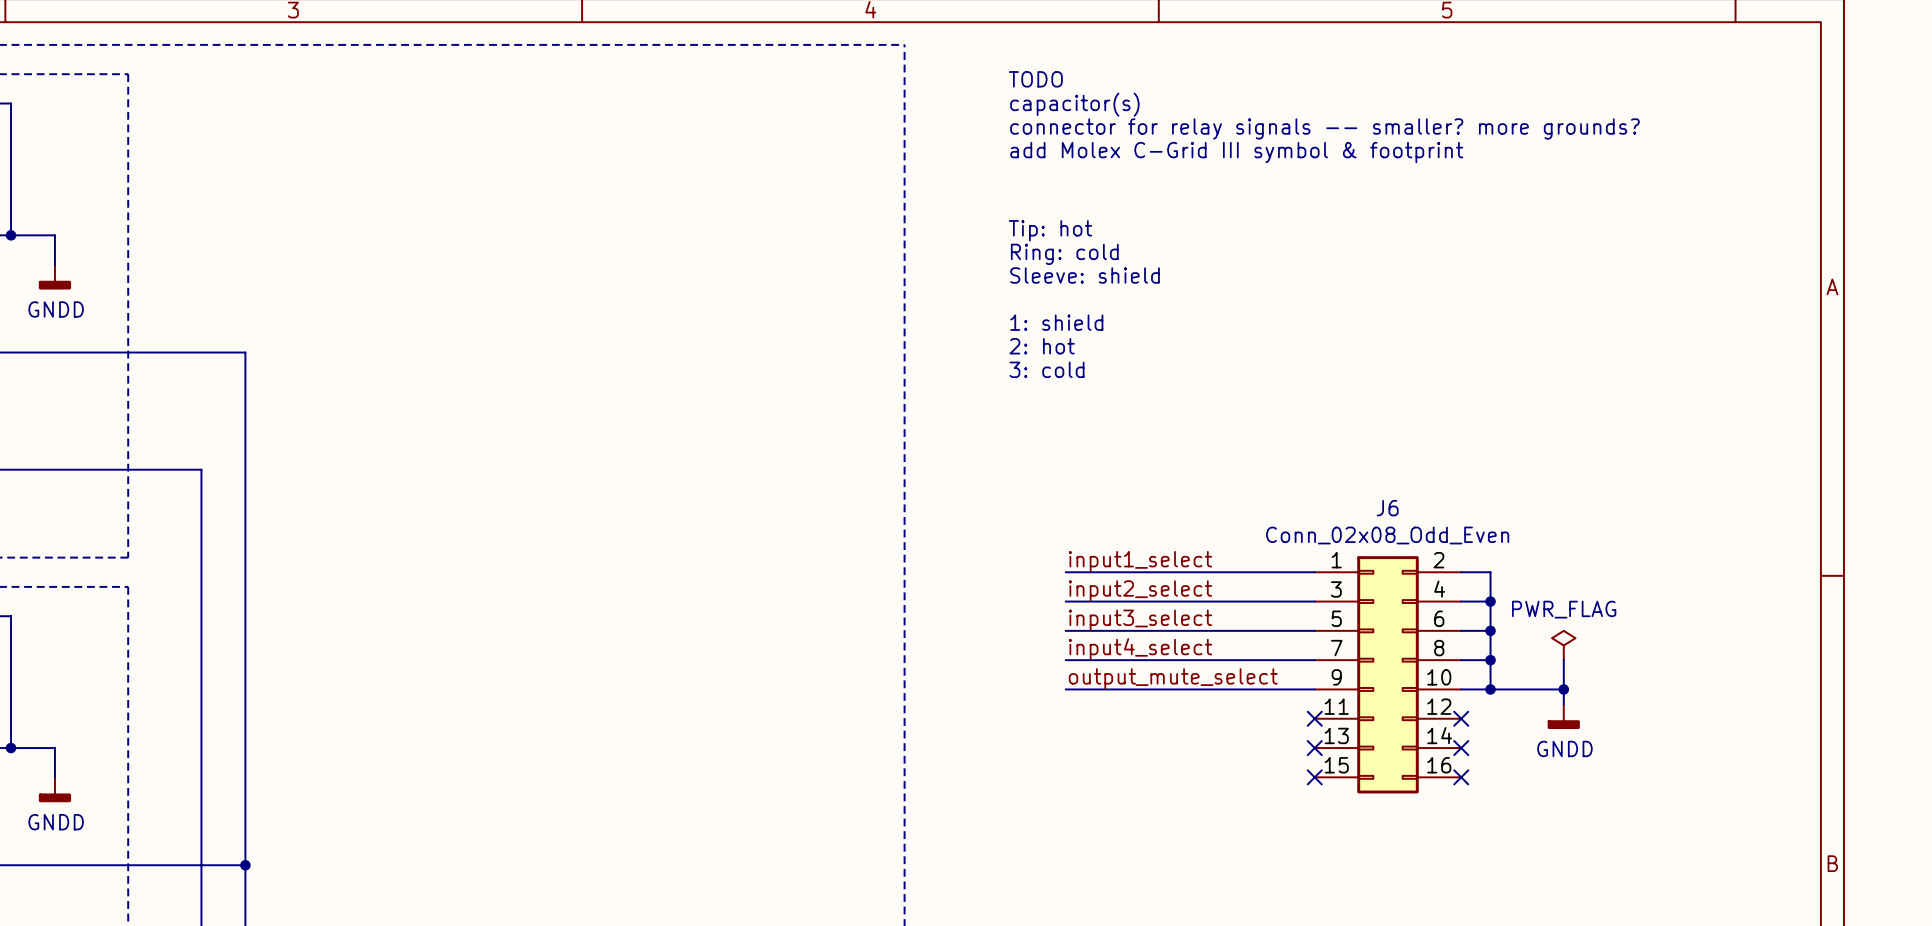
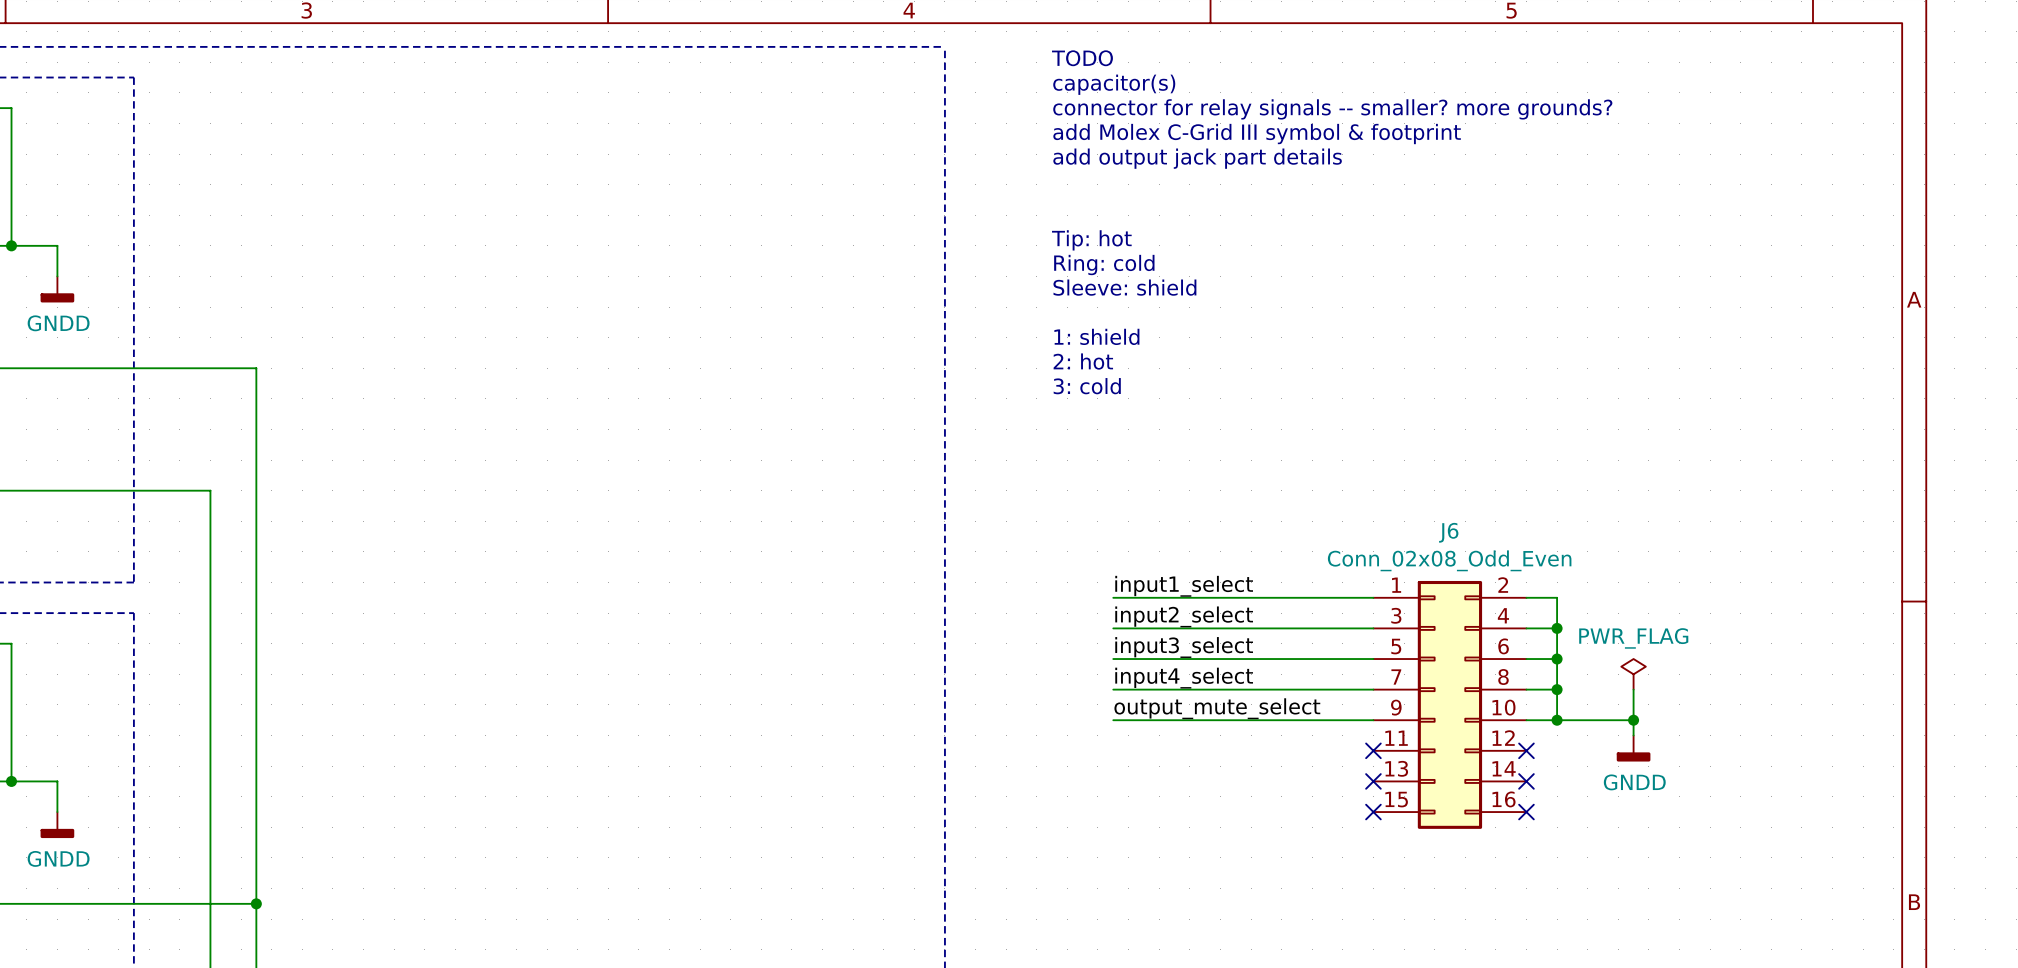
text: none -> TODO (1082, 58)
text: TODO (1035, 79) -> capacitor(s) (1114, 84)
text: capacitor(s) (1074, 104) -> connector for relay signals -- smaller? more grounds? (1332, 109)
text: connector for relay signals -- smaller? more grounds? (1324, 128) -> add Molex C-Grid III symbol & footprint (1257, 134)
text: add Molex C-Grid III symbol & footprint (1236, 152) -> add output jack part details (1197, 158)

